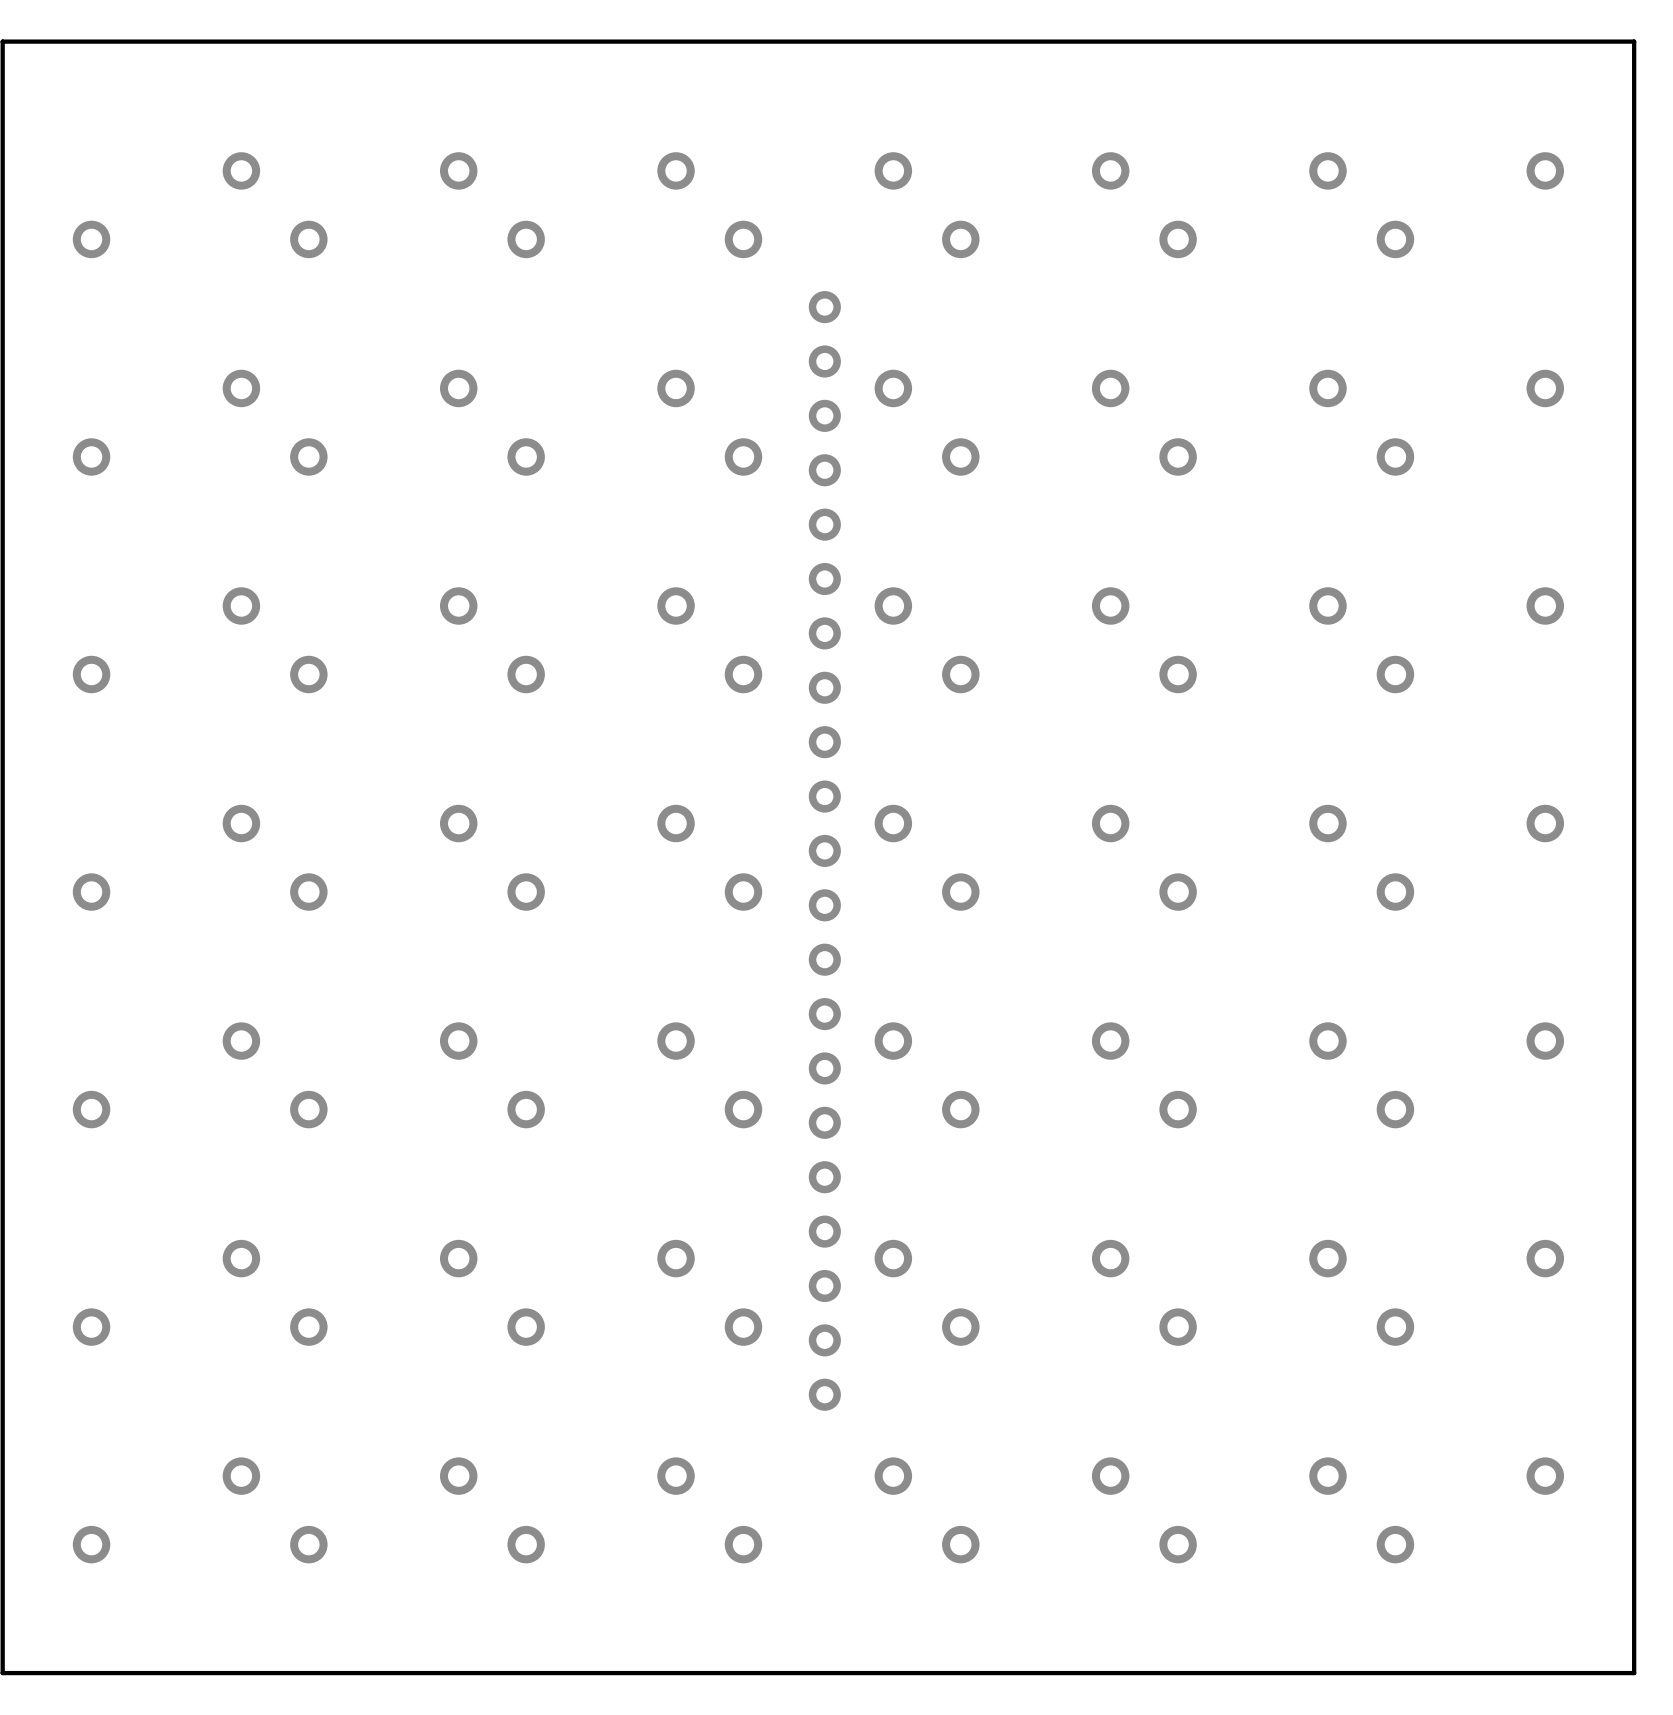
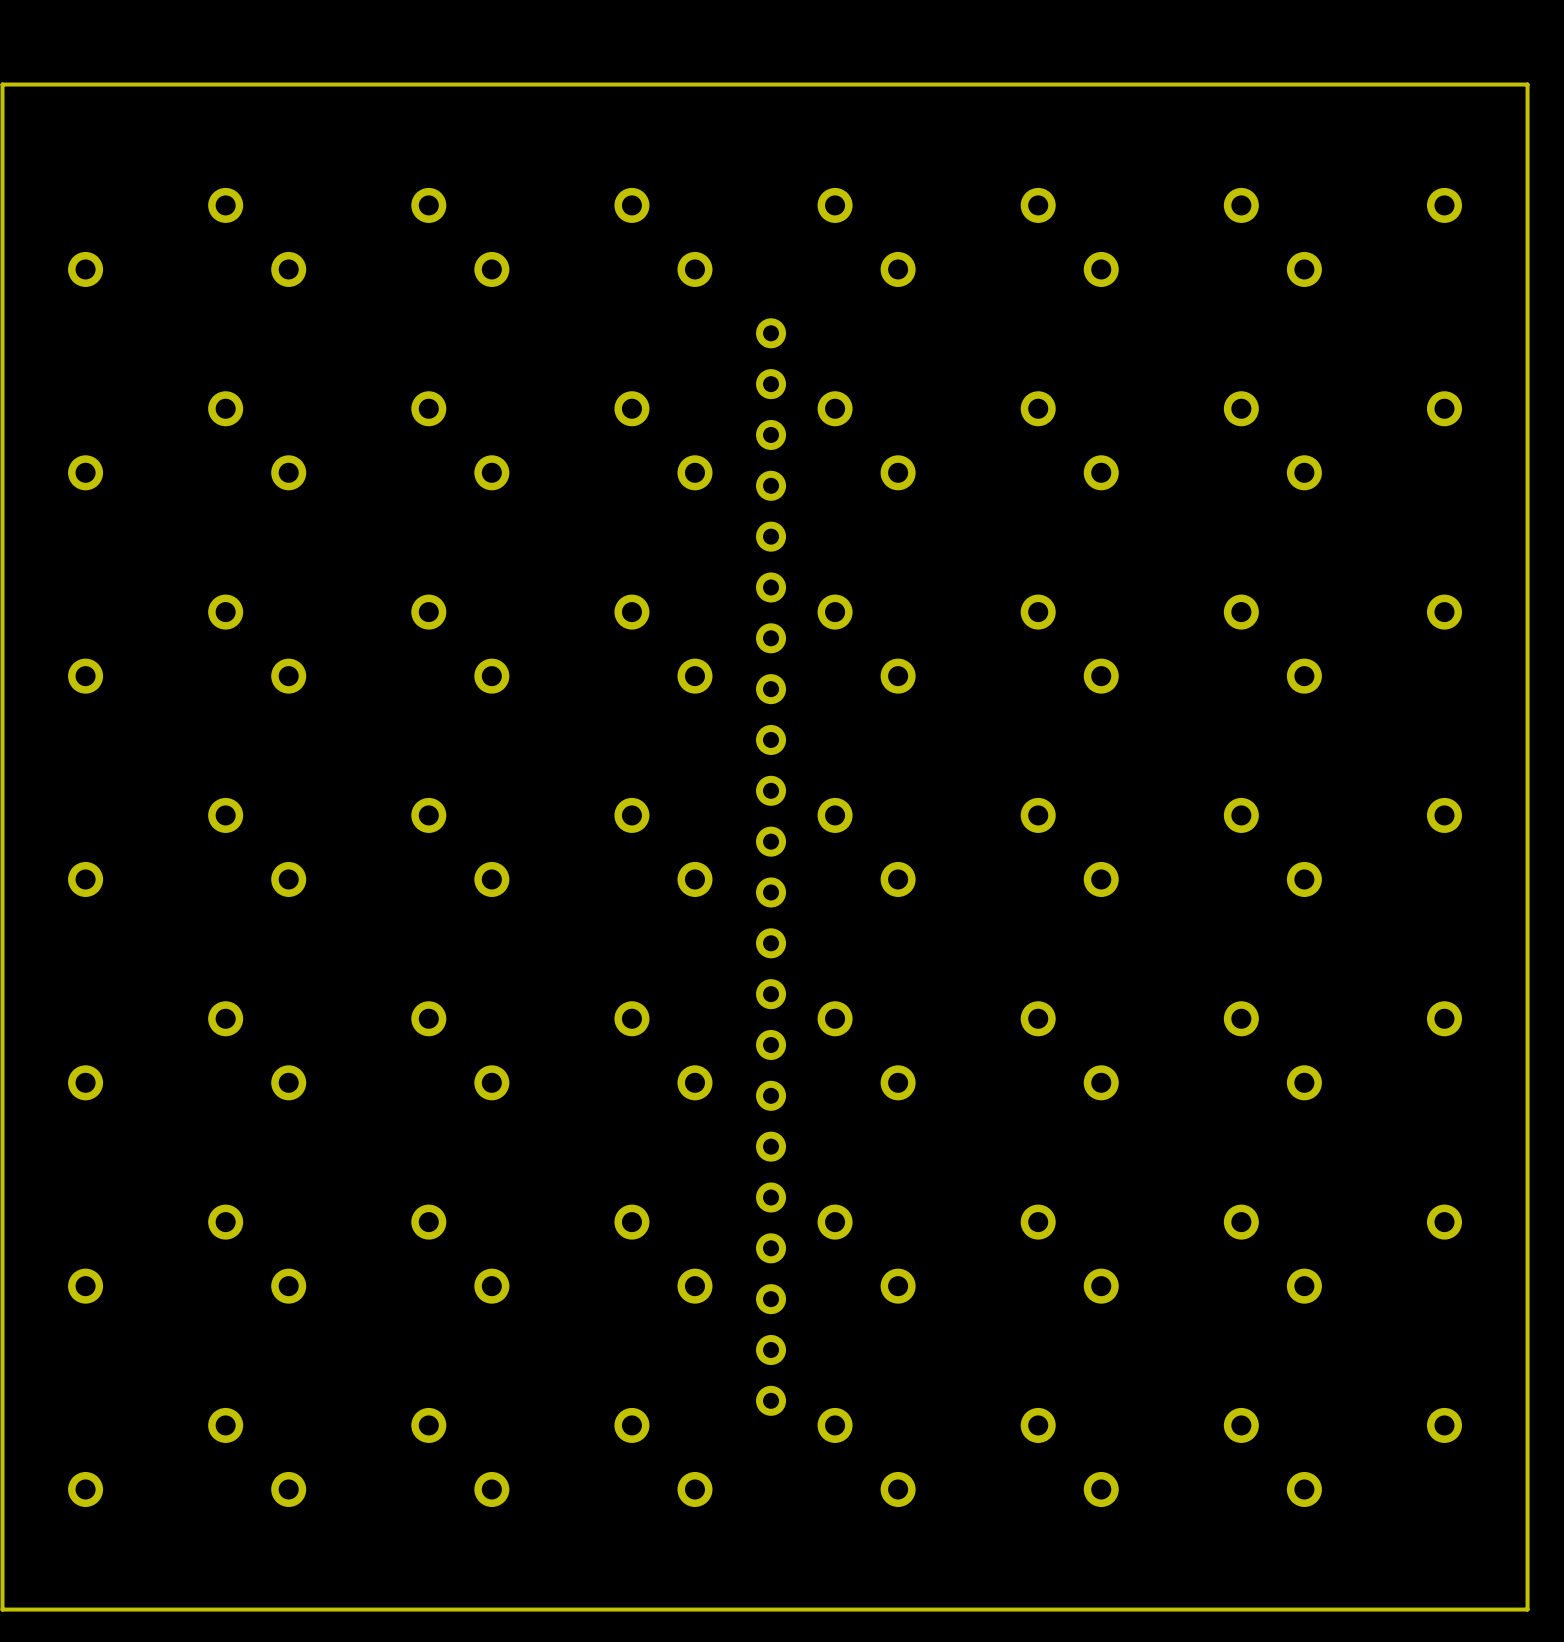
part: (824, 850) -> none
part: none -> (771, 867)

